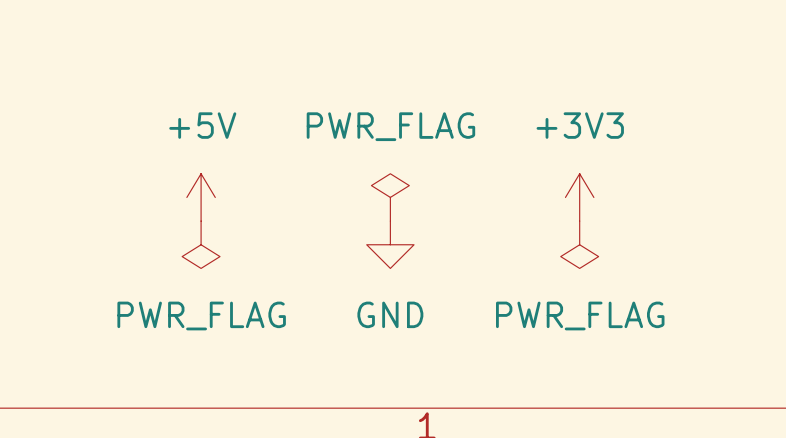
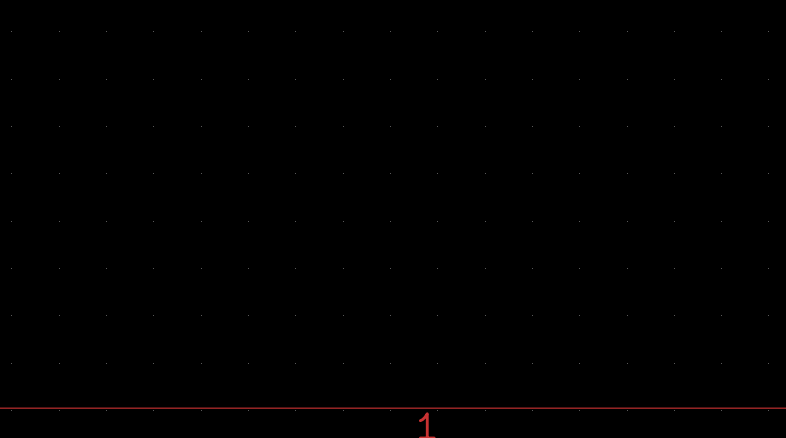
power symbol: +5V (201, 197) -> none
power symbol: PWR_FLAG (390, 197) -> none
power symbol: +3V3 (579, 197) -> none
power symbol: PWR_FLAG (201, 244) -> none
power symbol: GND (390, 244) -> none
power symbol: PWR_FLAG (579, 244) -> none

